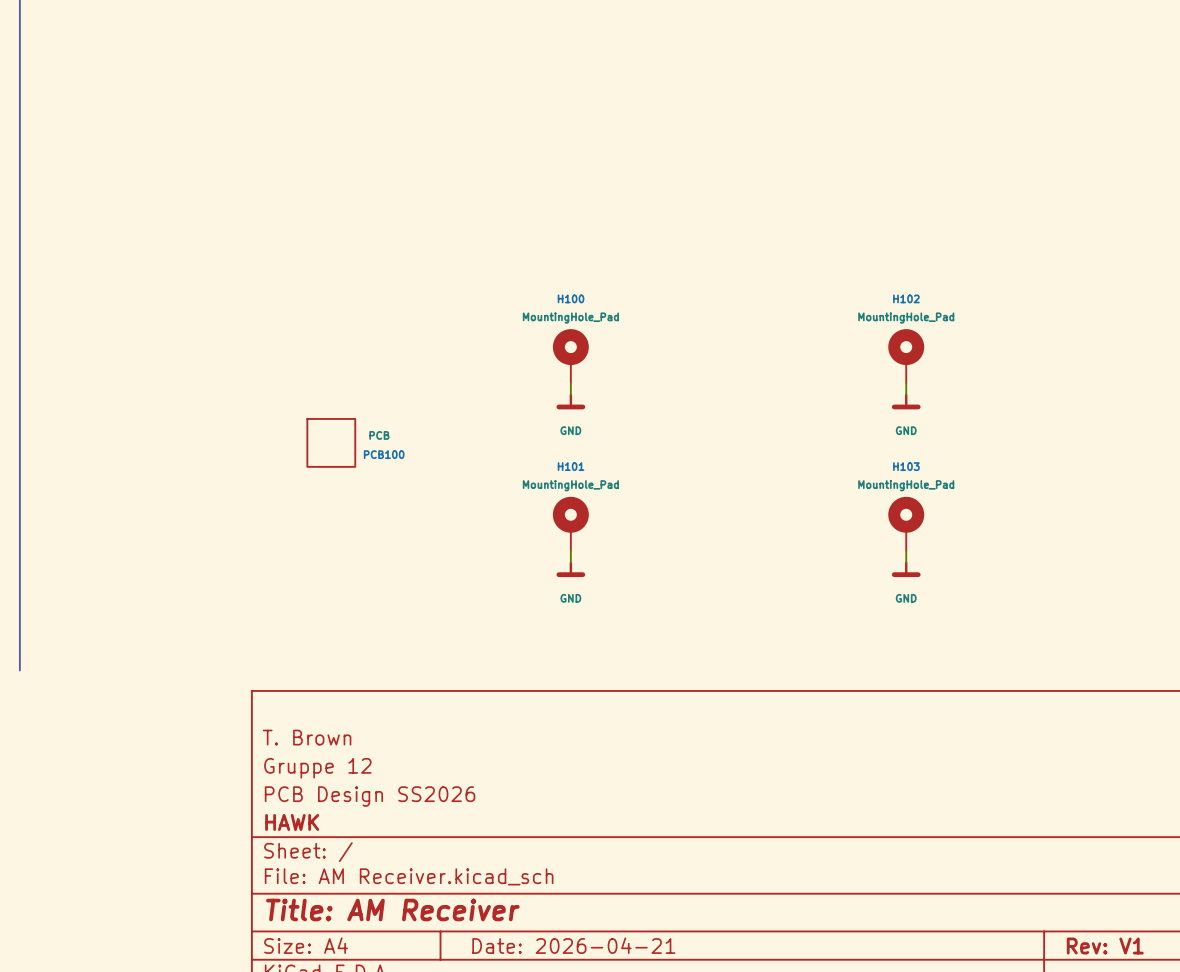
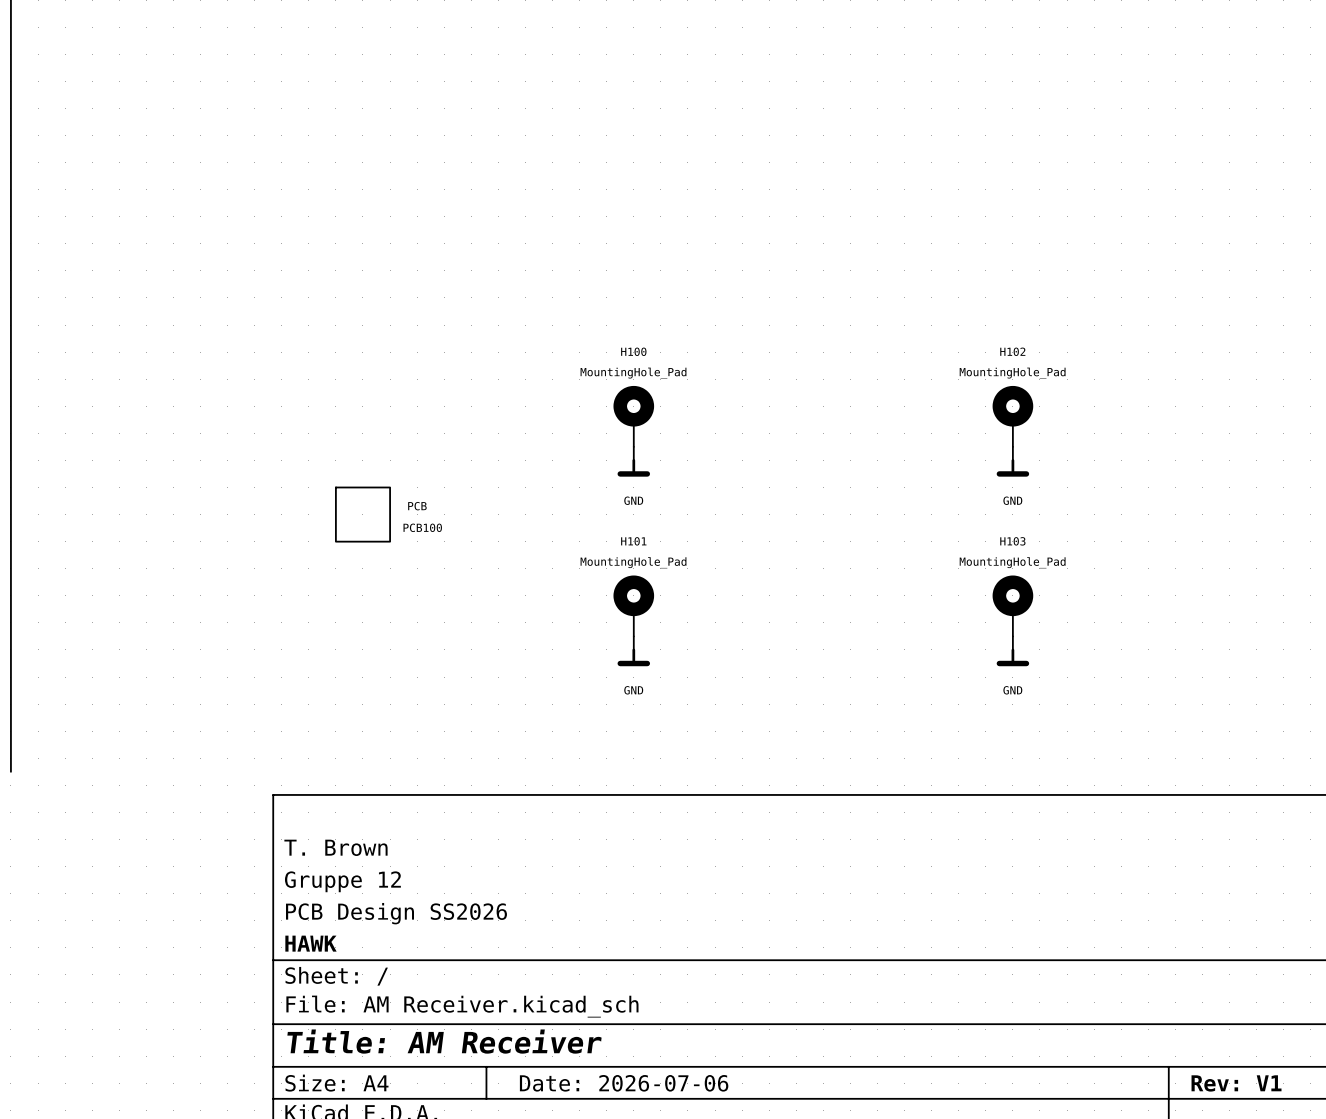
title block: Date: 2026-04-21 (573, 945) -> Date: 2026-07-06 (624, 1083)

